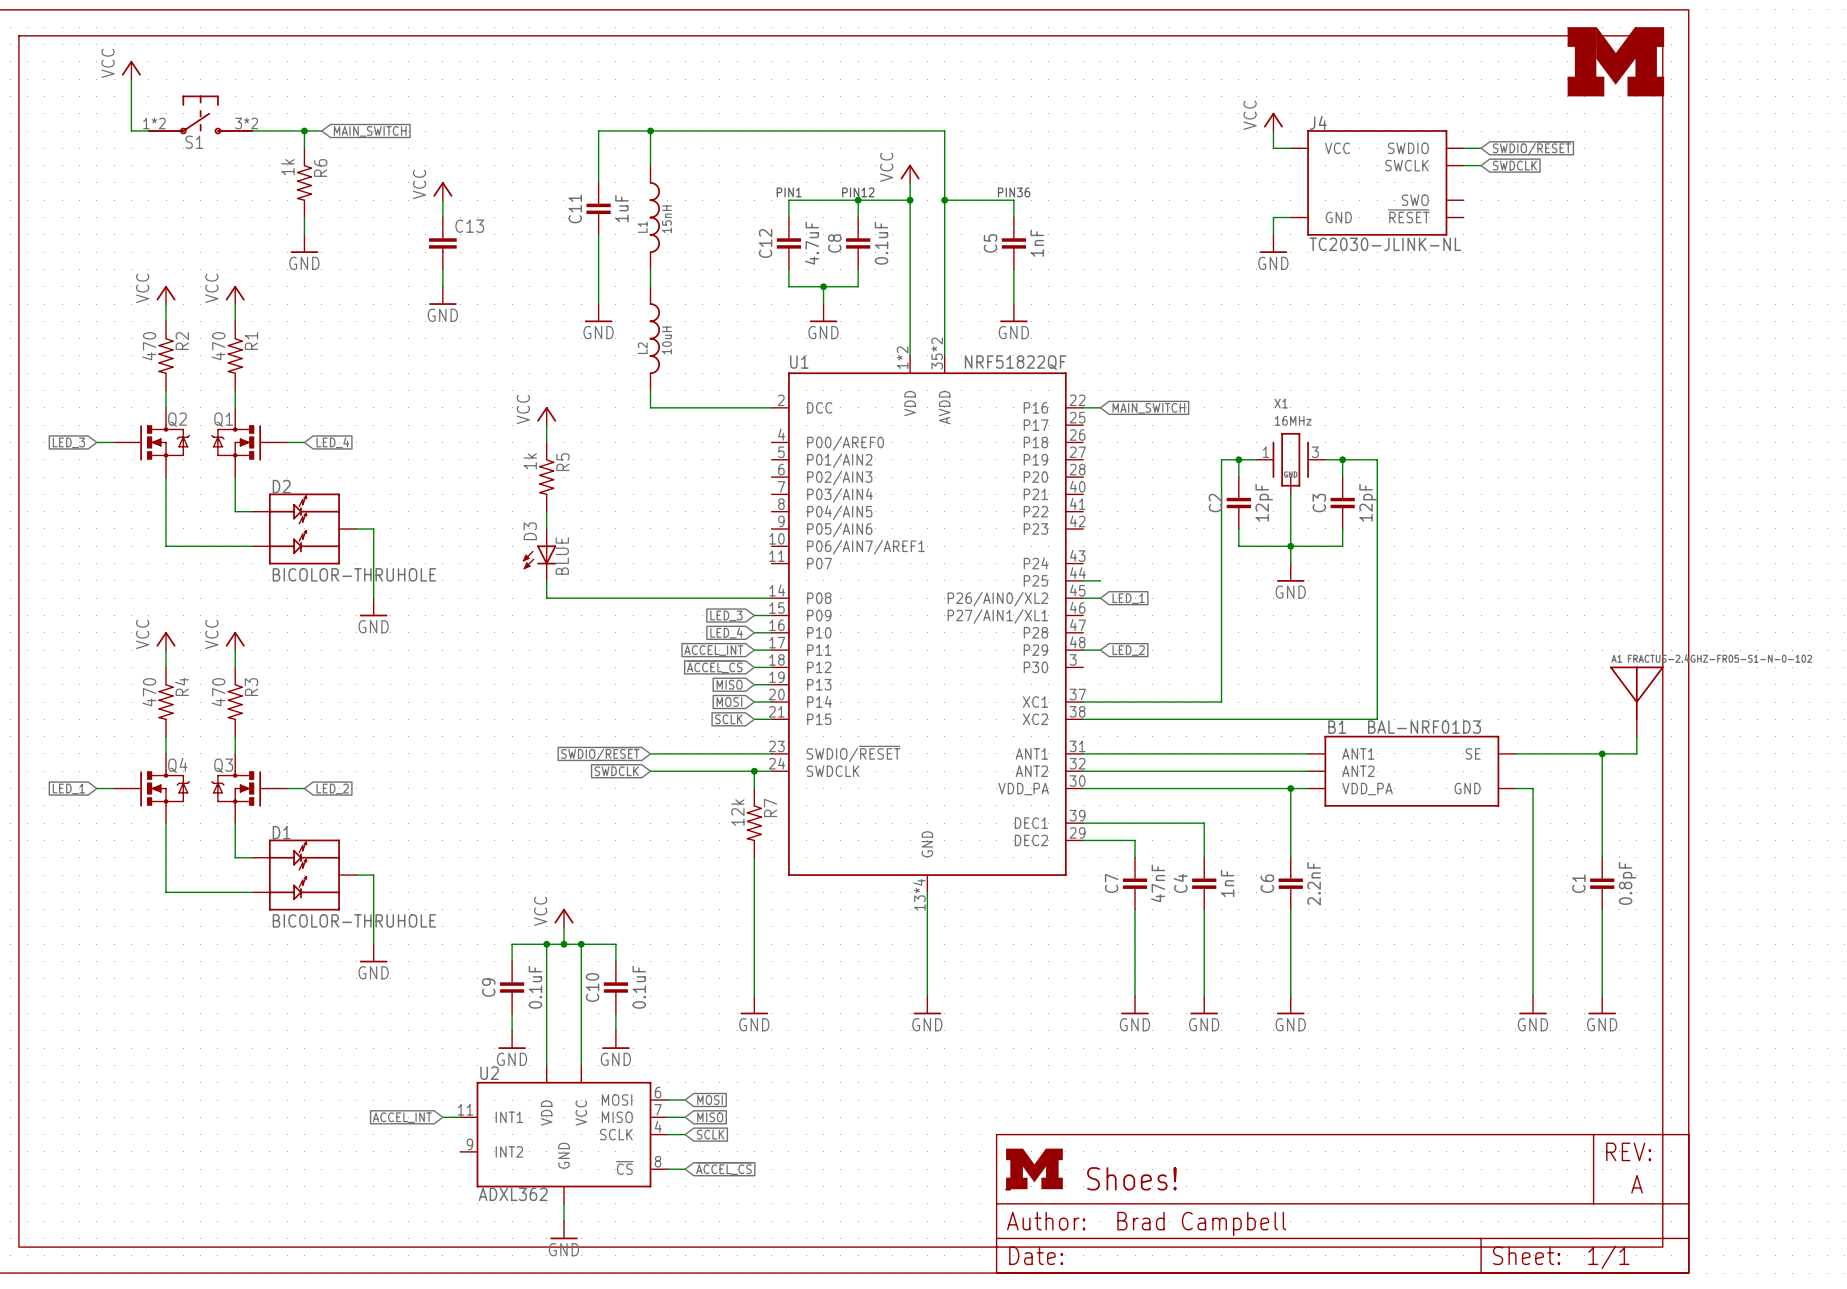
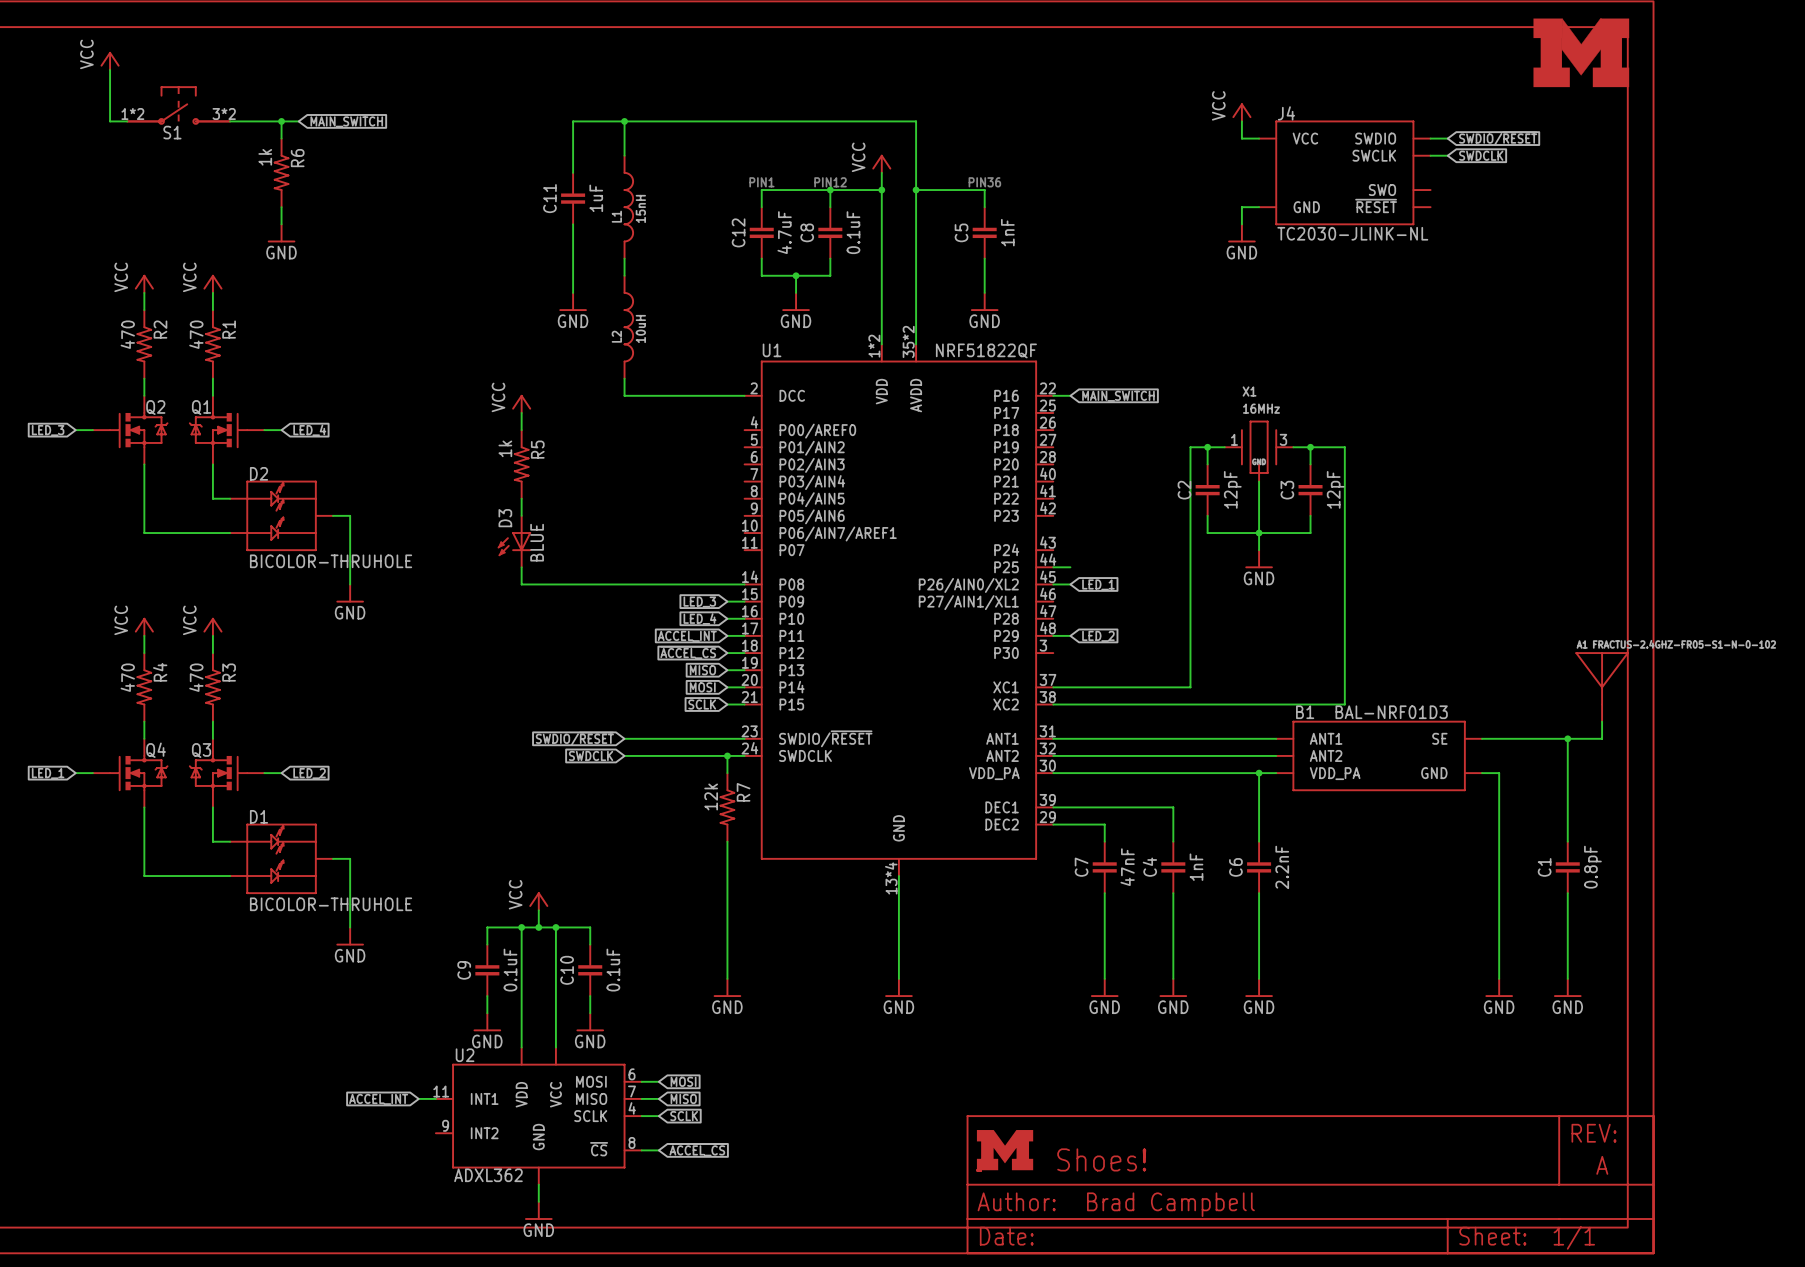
power symbol: VCC (442, 191) -> none
wire: (442, 200) (442, 217) -> none
C13: (442, 243) -> none
wire: (442, 269) (442, 286) -> none
power symbol: GND (442, 295) -> none

